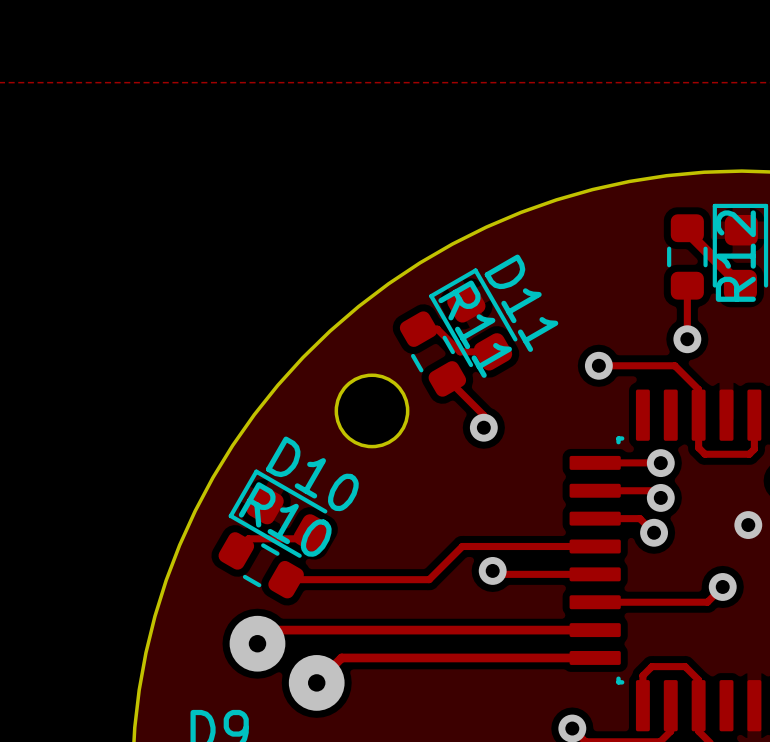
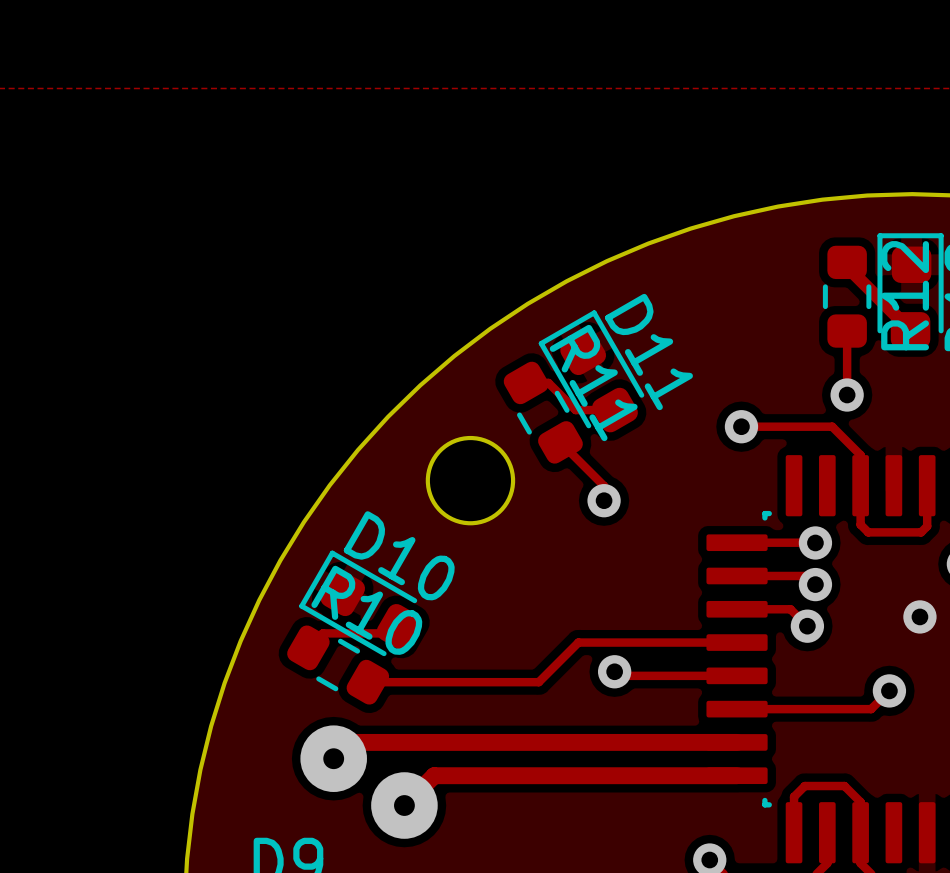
track width: thin (271, 630) (595, 630) -> thick (349, 742) (737, 742)
track width: thin (595, 657) (341, 657) (316, 682) -> thick (737, 775) (434, 775) (404, 805)

